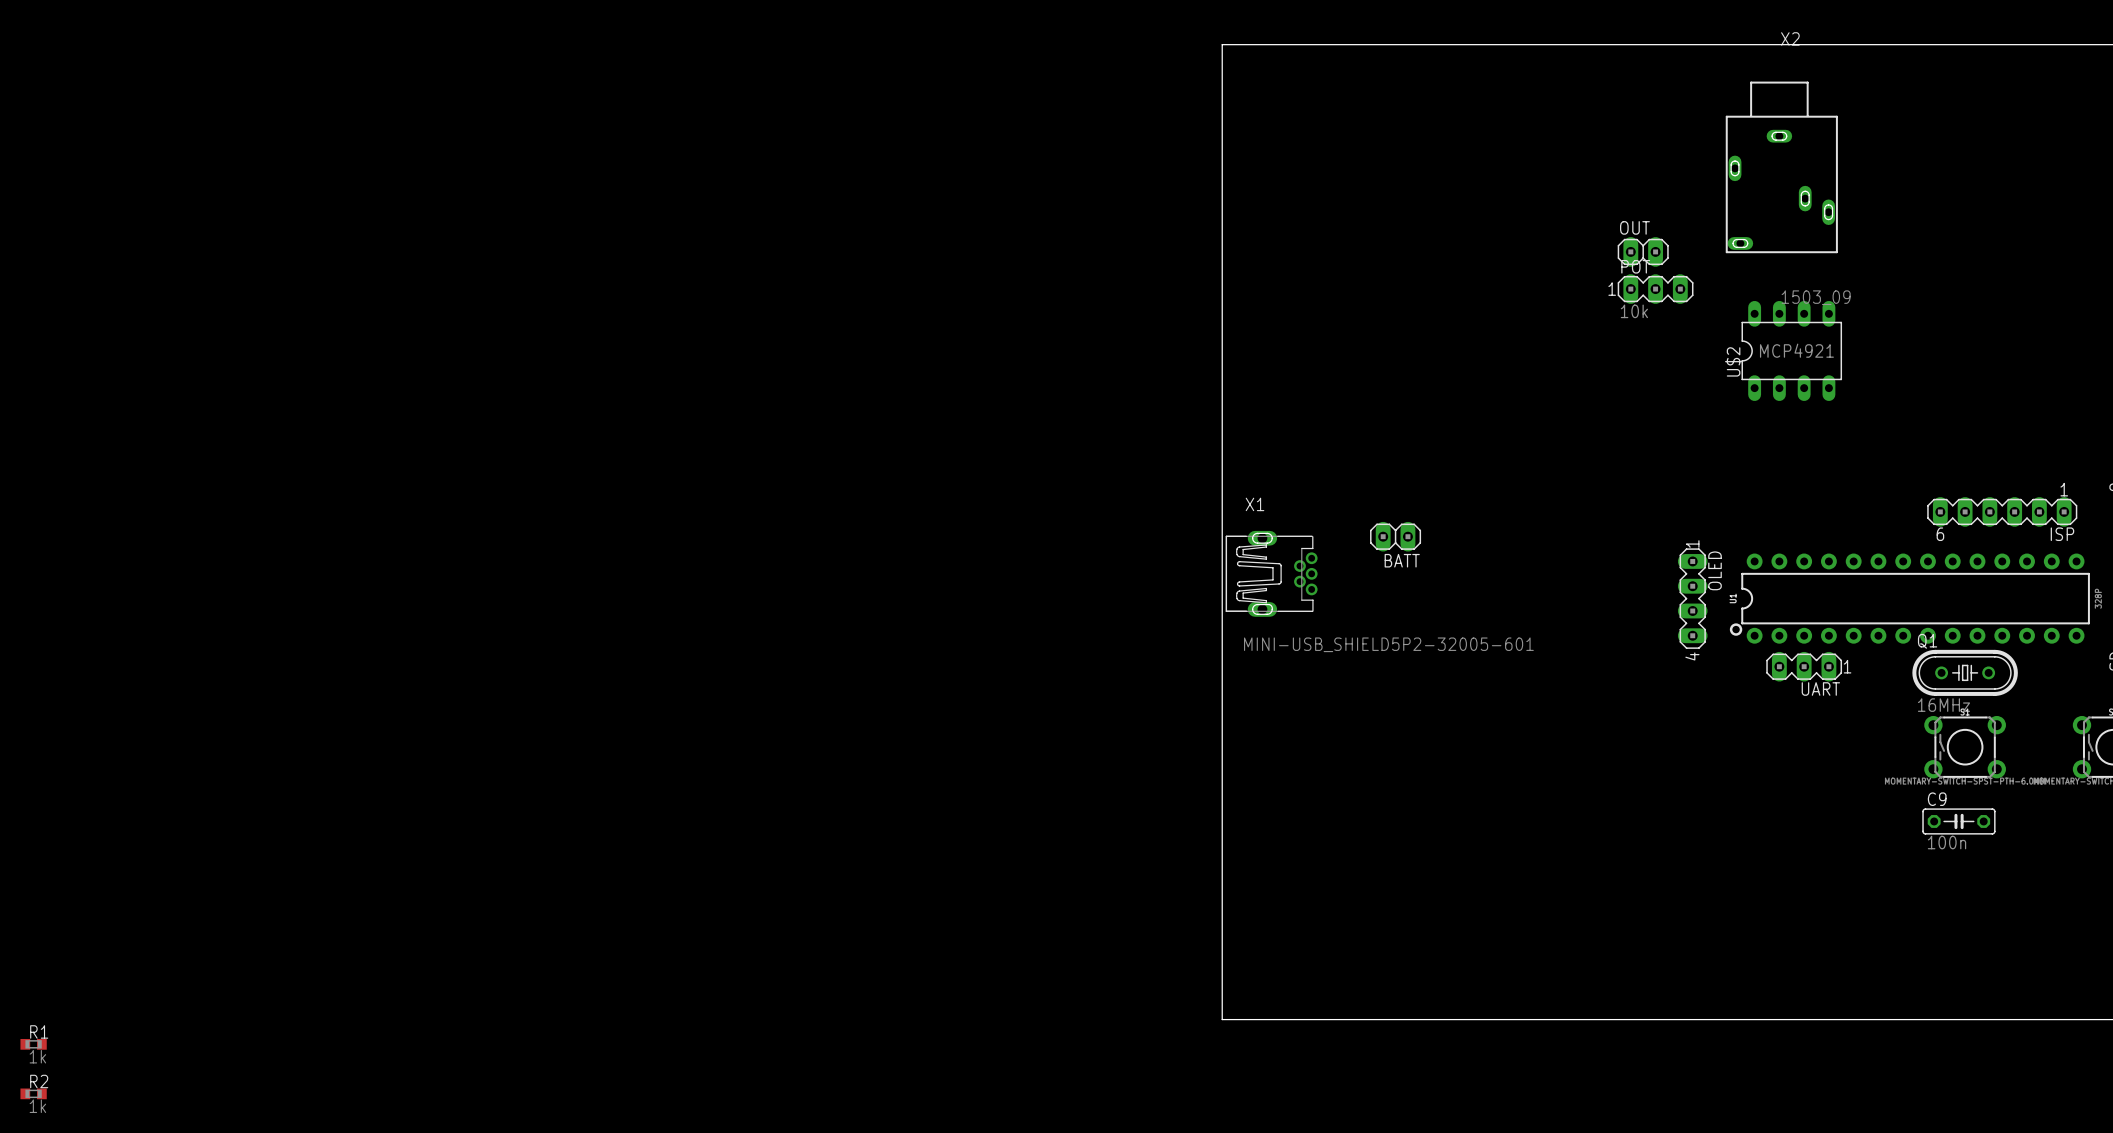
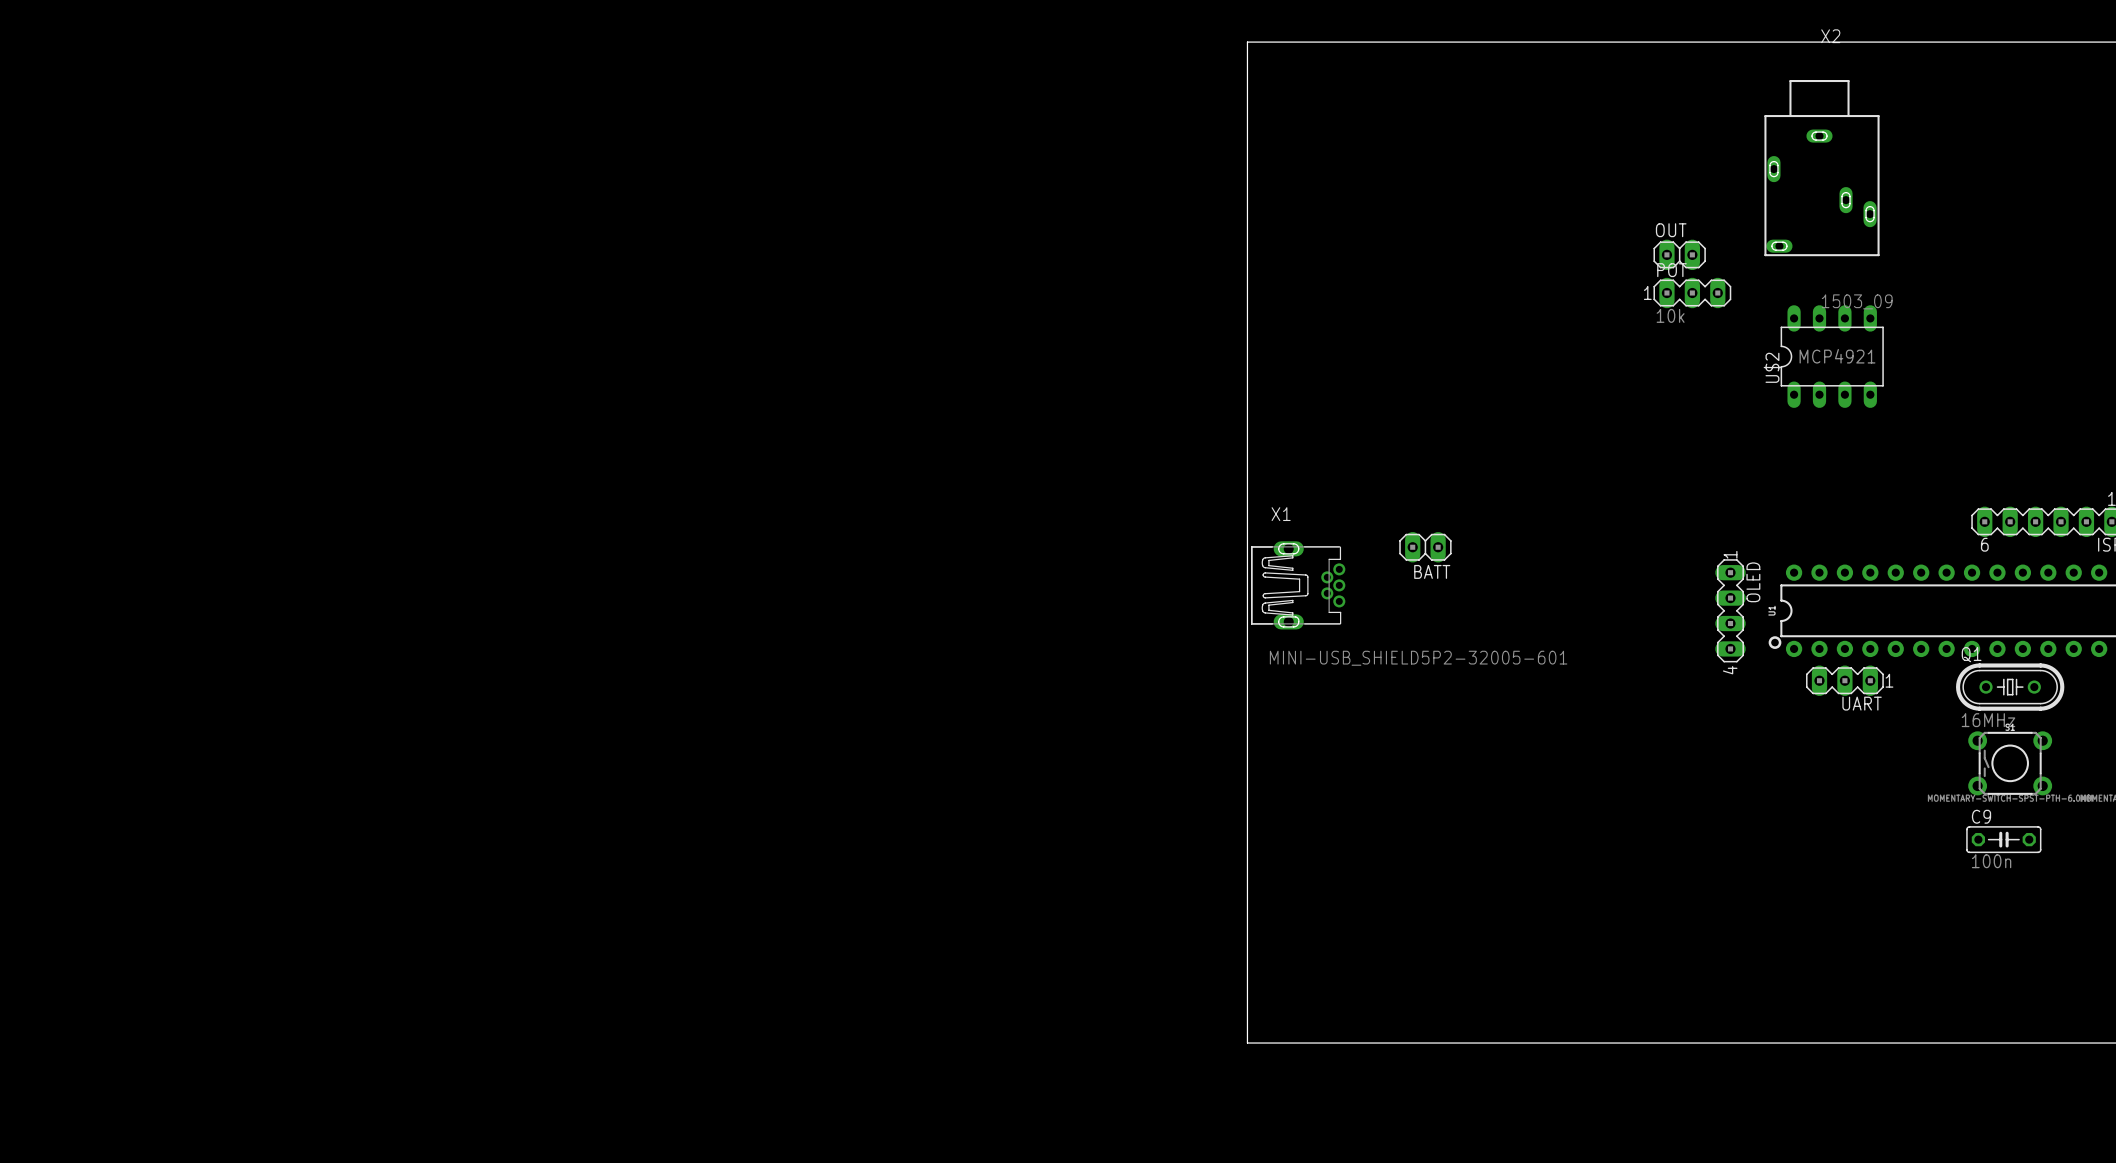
R1: 1k (33, 1044) -> none
R2: 1k (33, 1093) -> none

